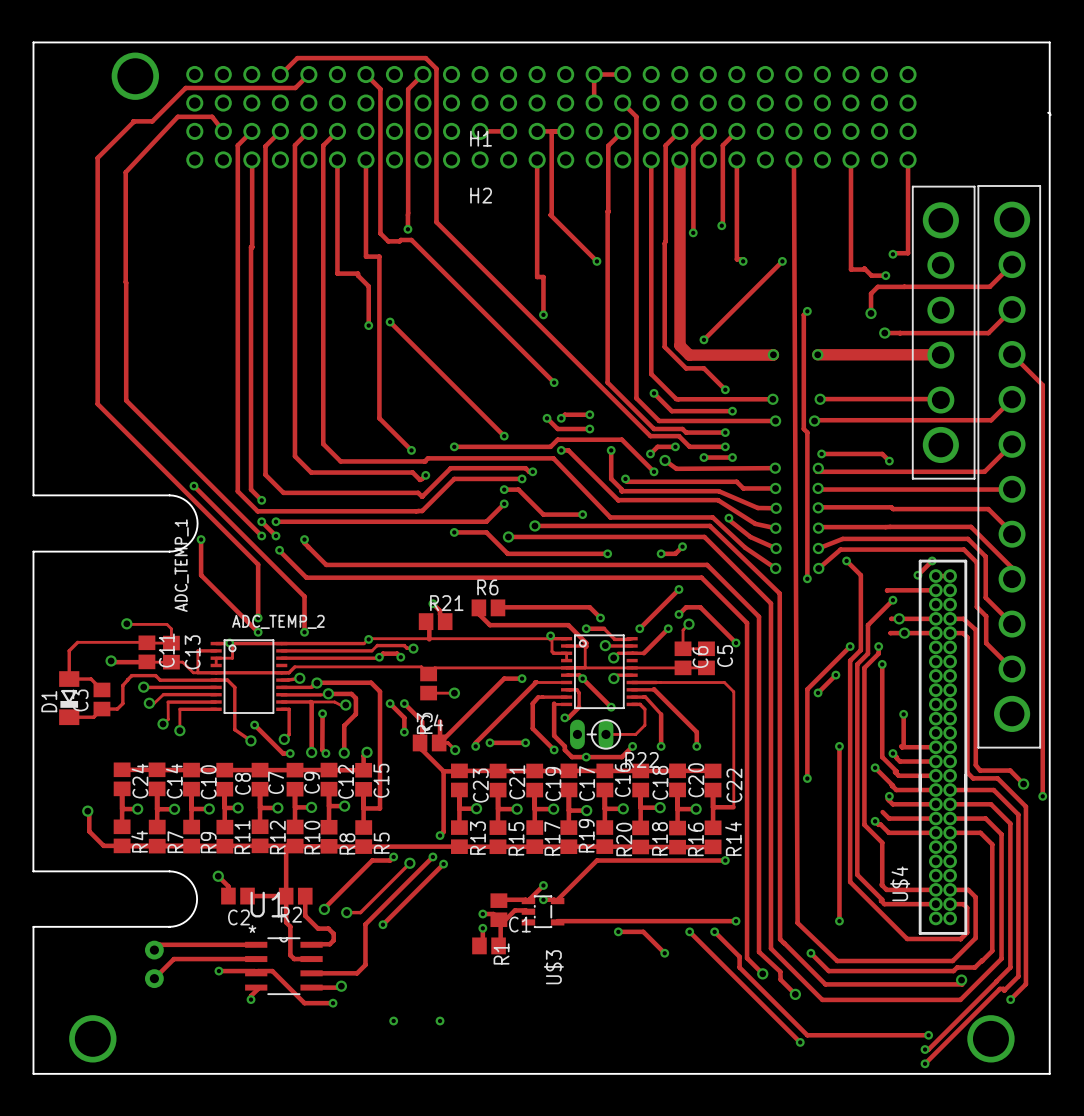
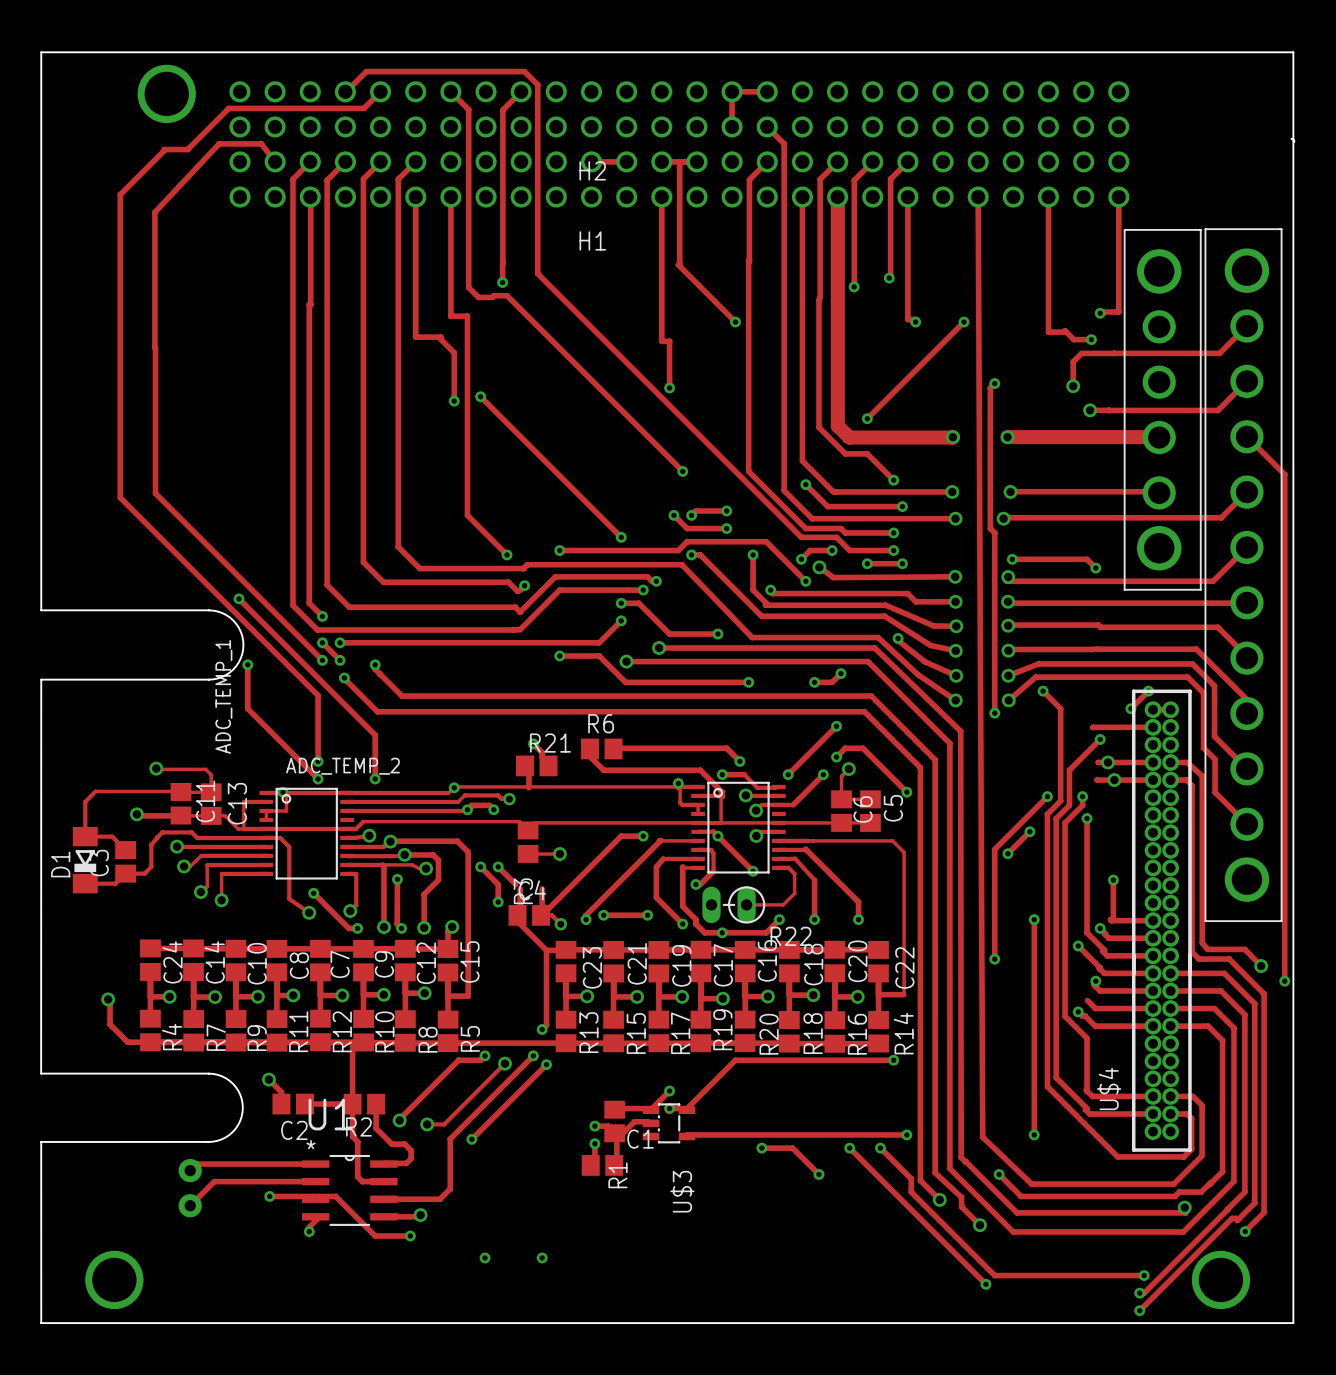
H1 name: H1 (481, 138) -> H2 (592, 170)
H2 name: H2 (481, 195) -> H1 (592, 240)

